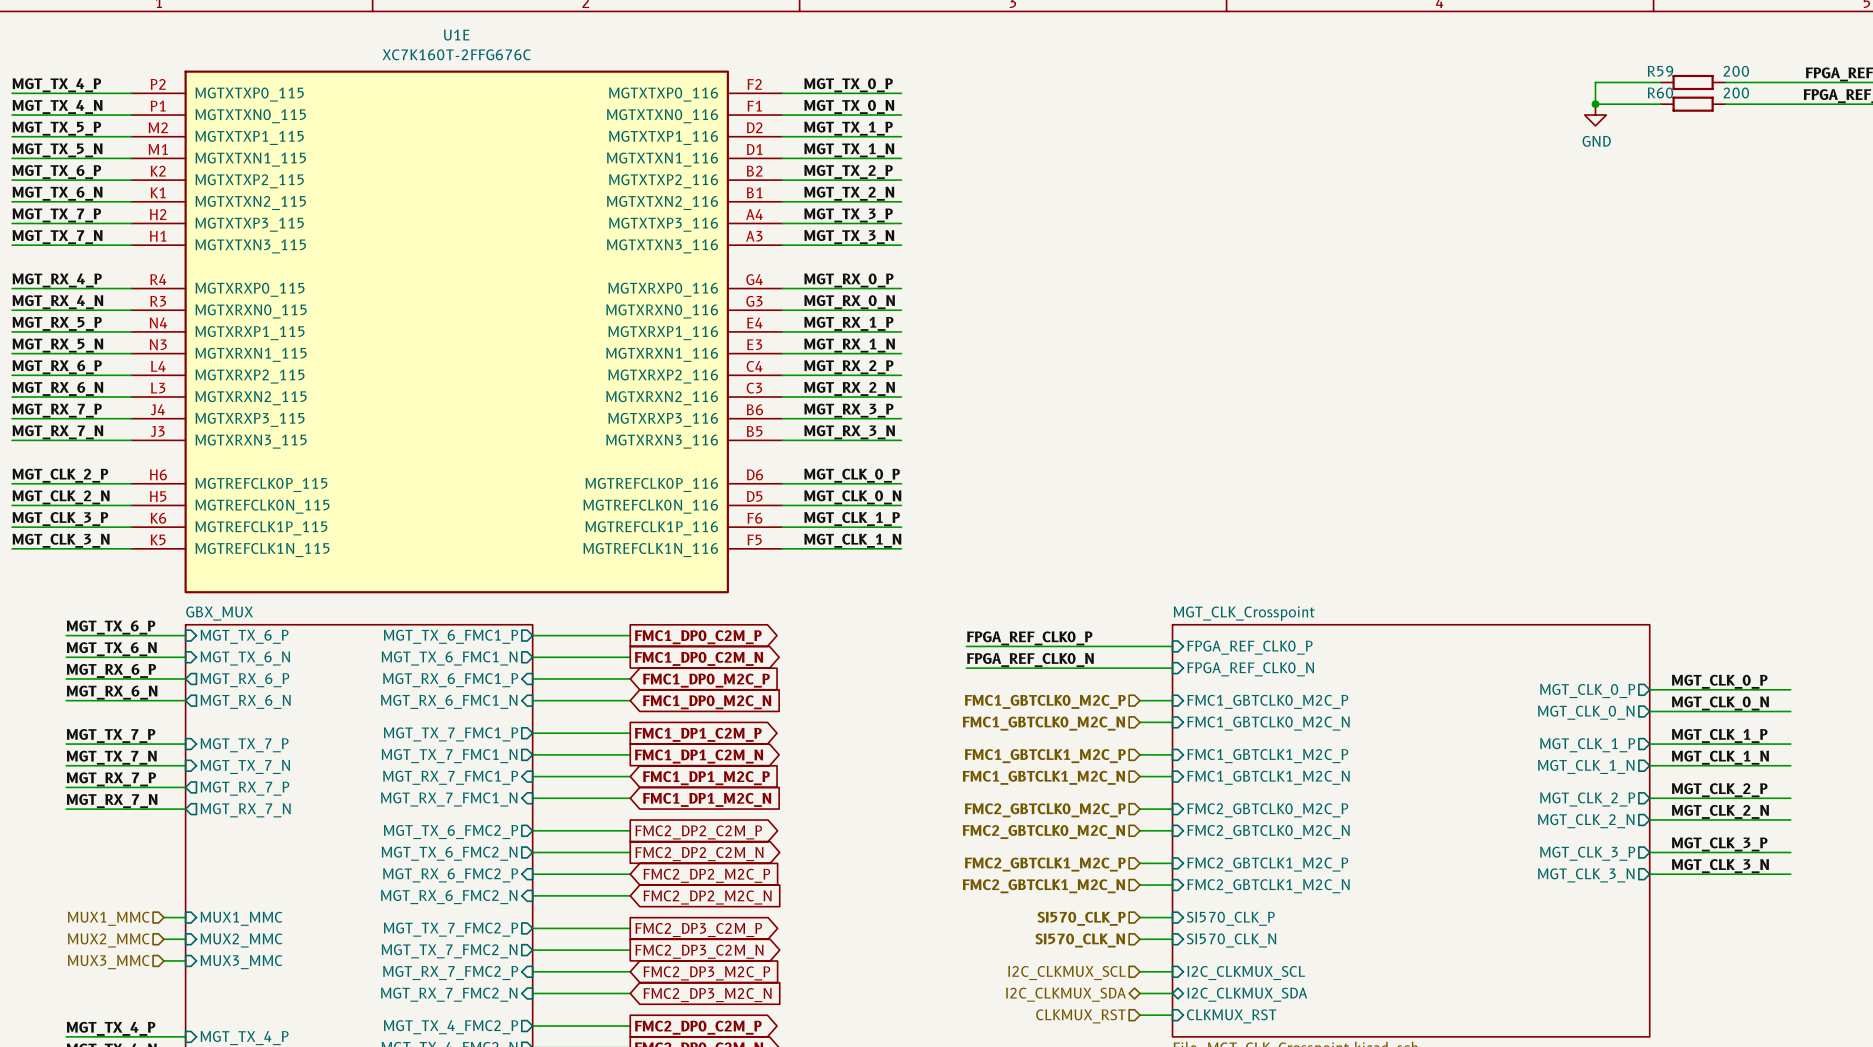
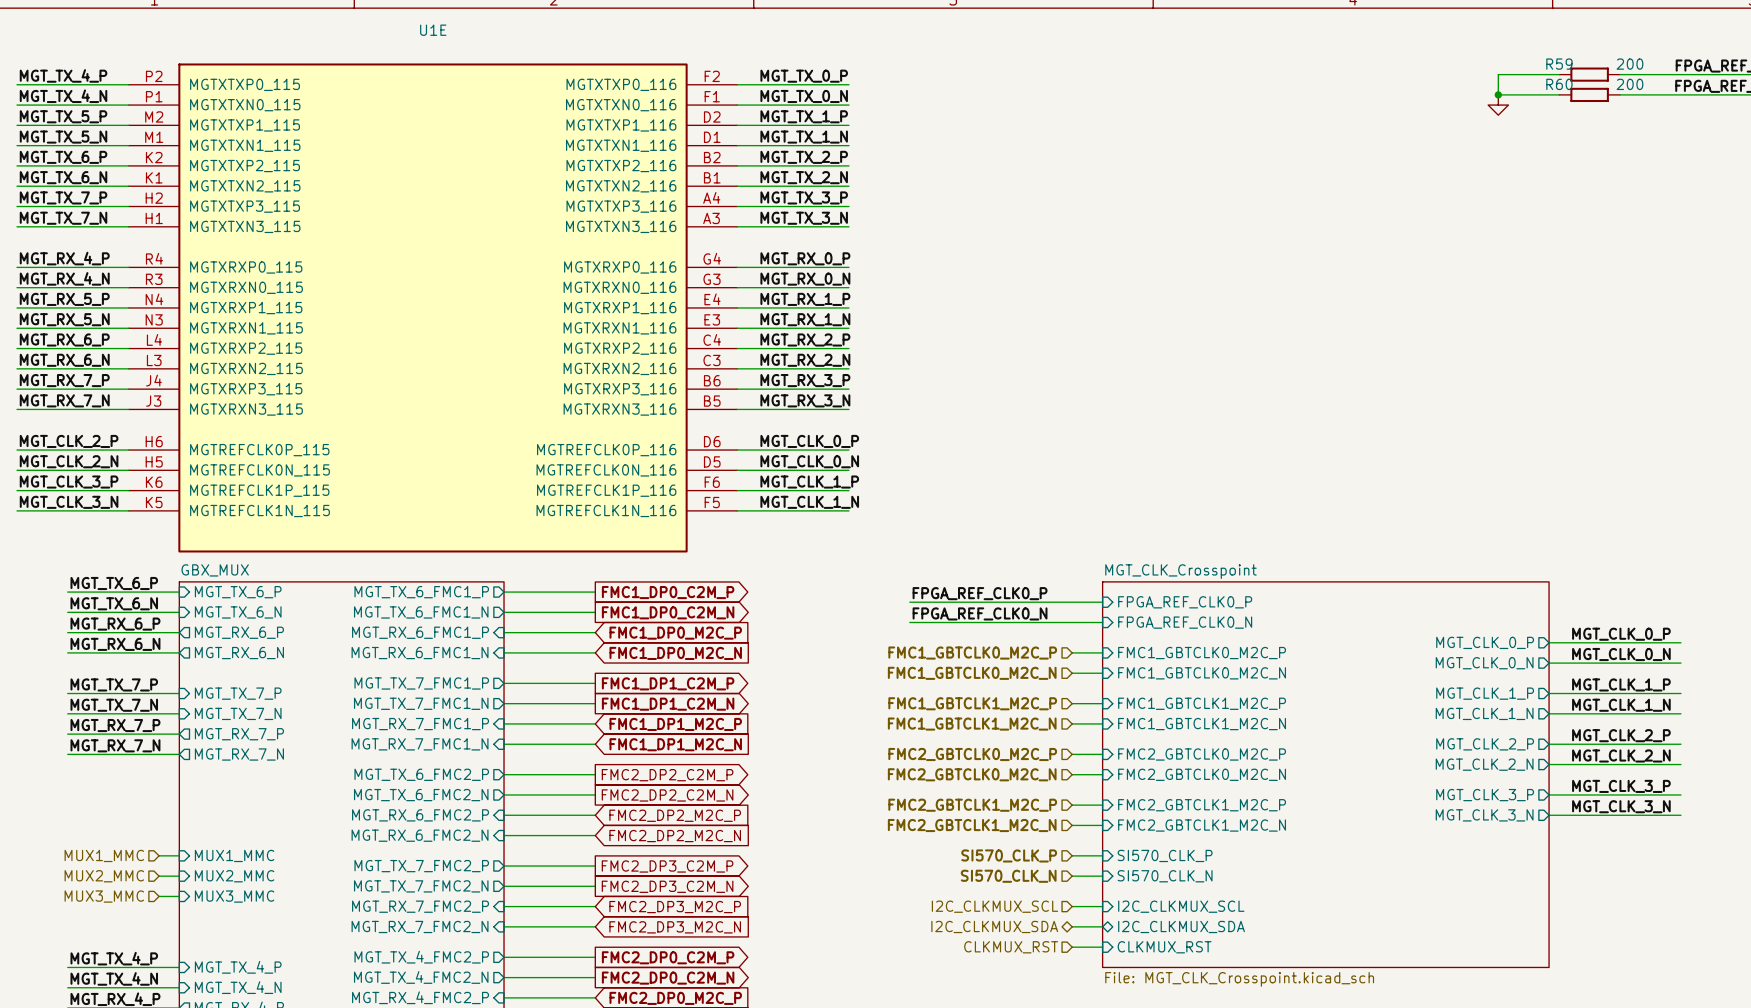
U1E value: XC7K160T-2FFG676C (456, 54) -> none
power symbol text: GND (1596, 141) -> none

